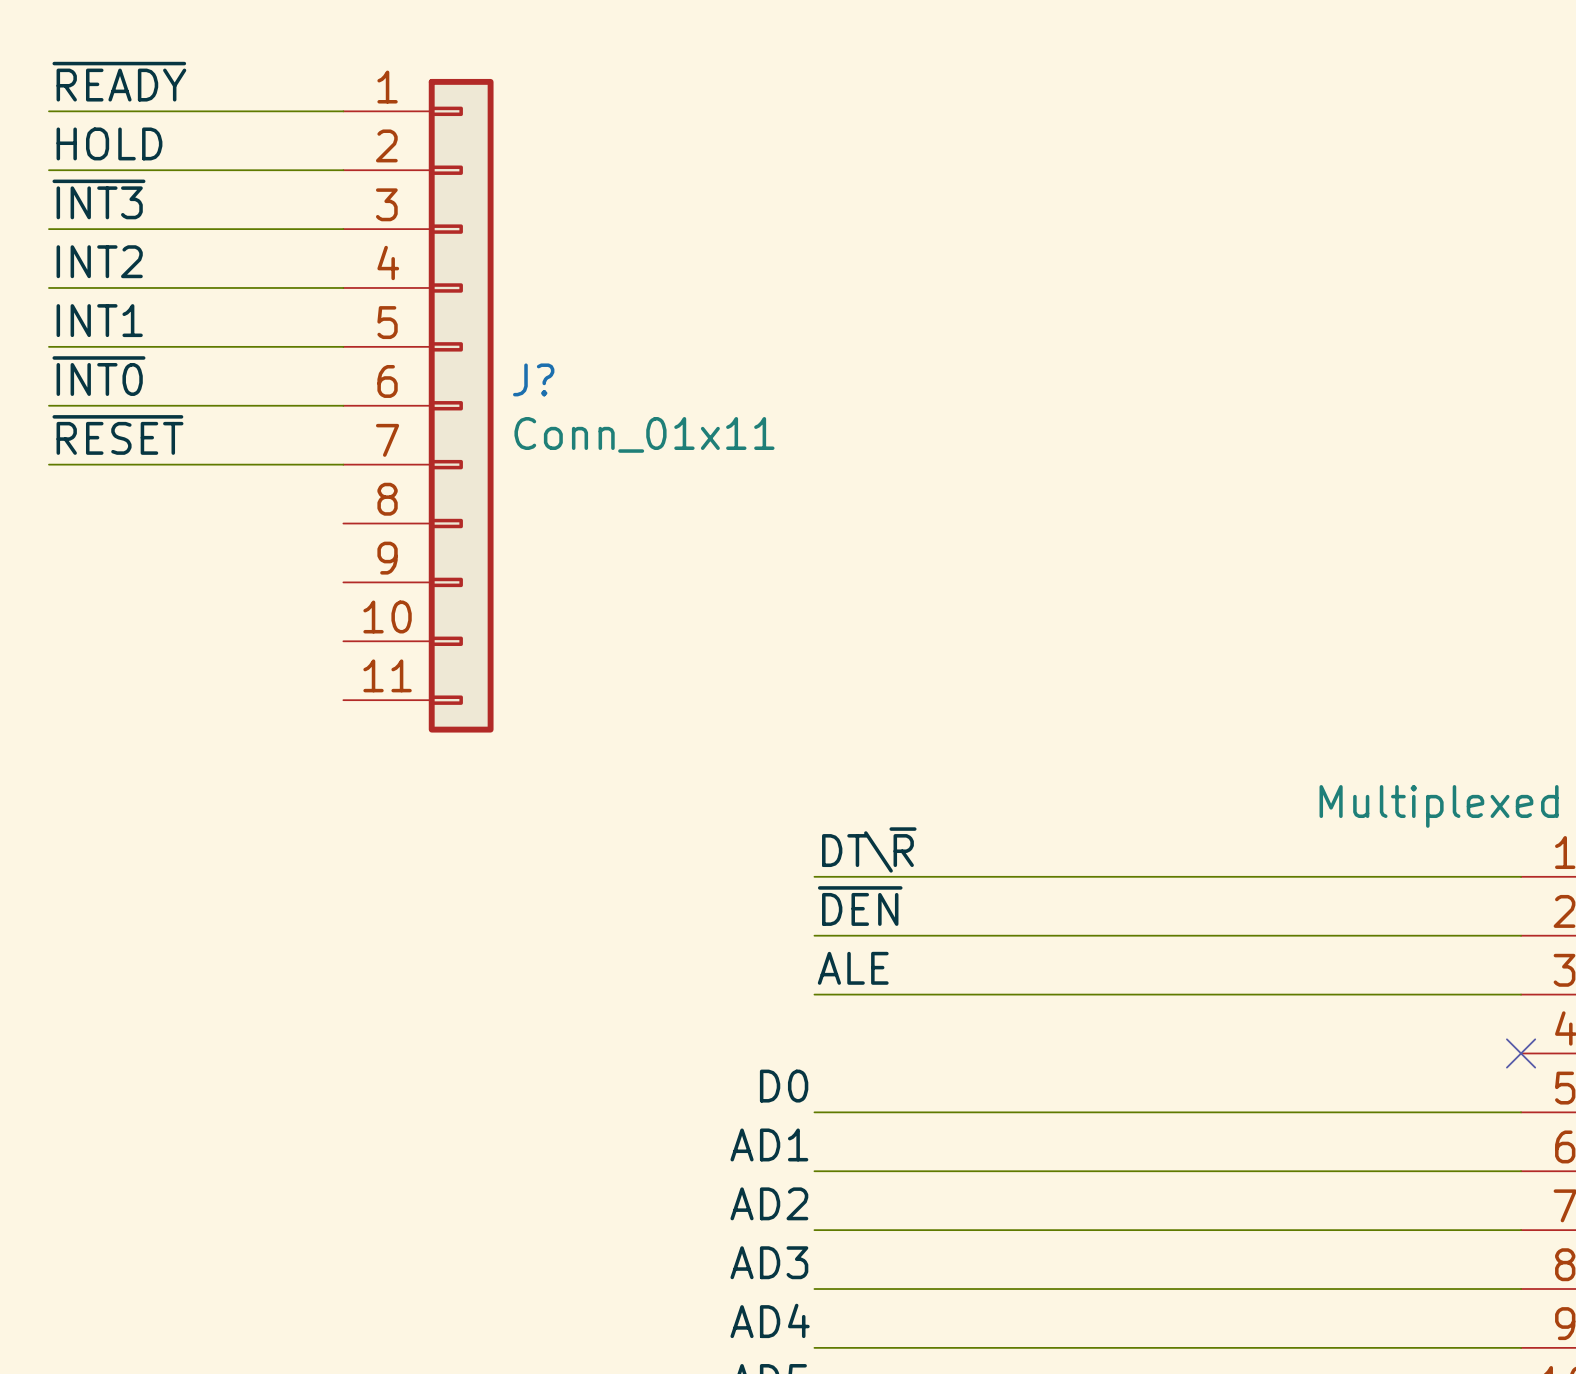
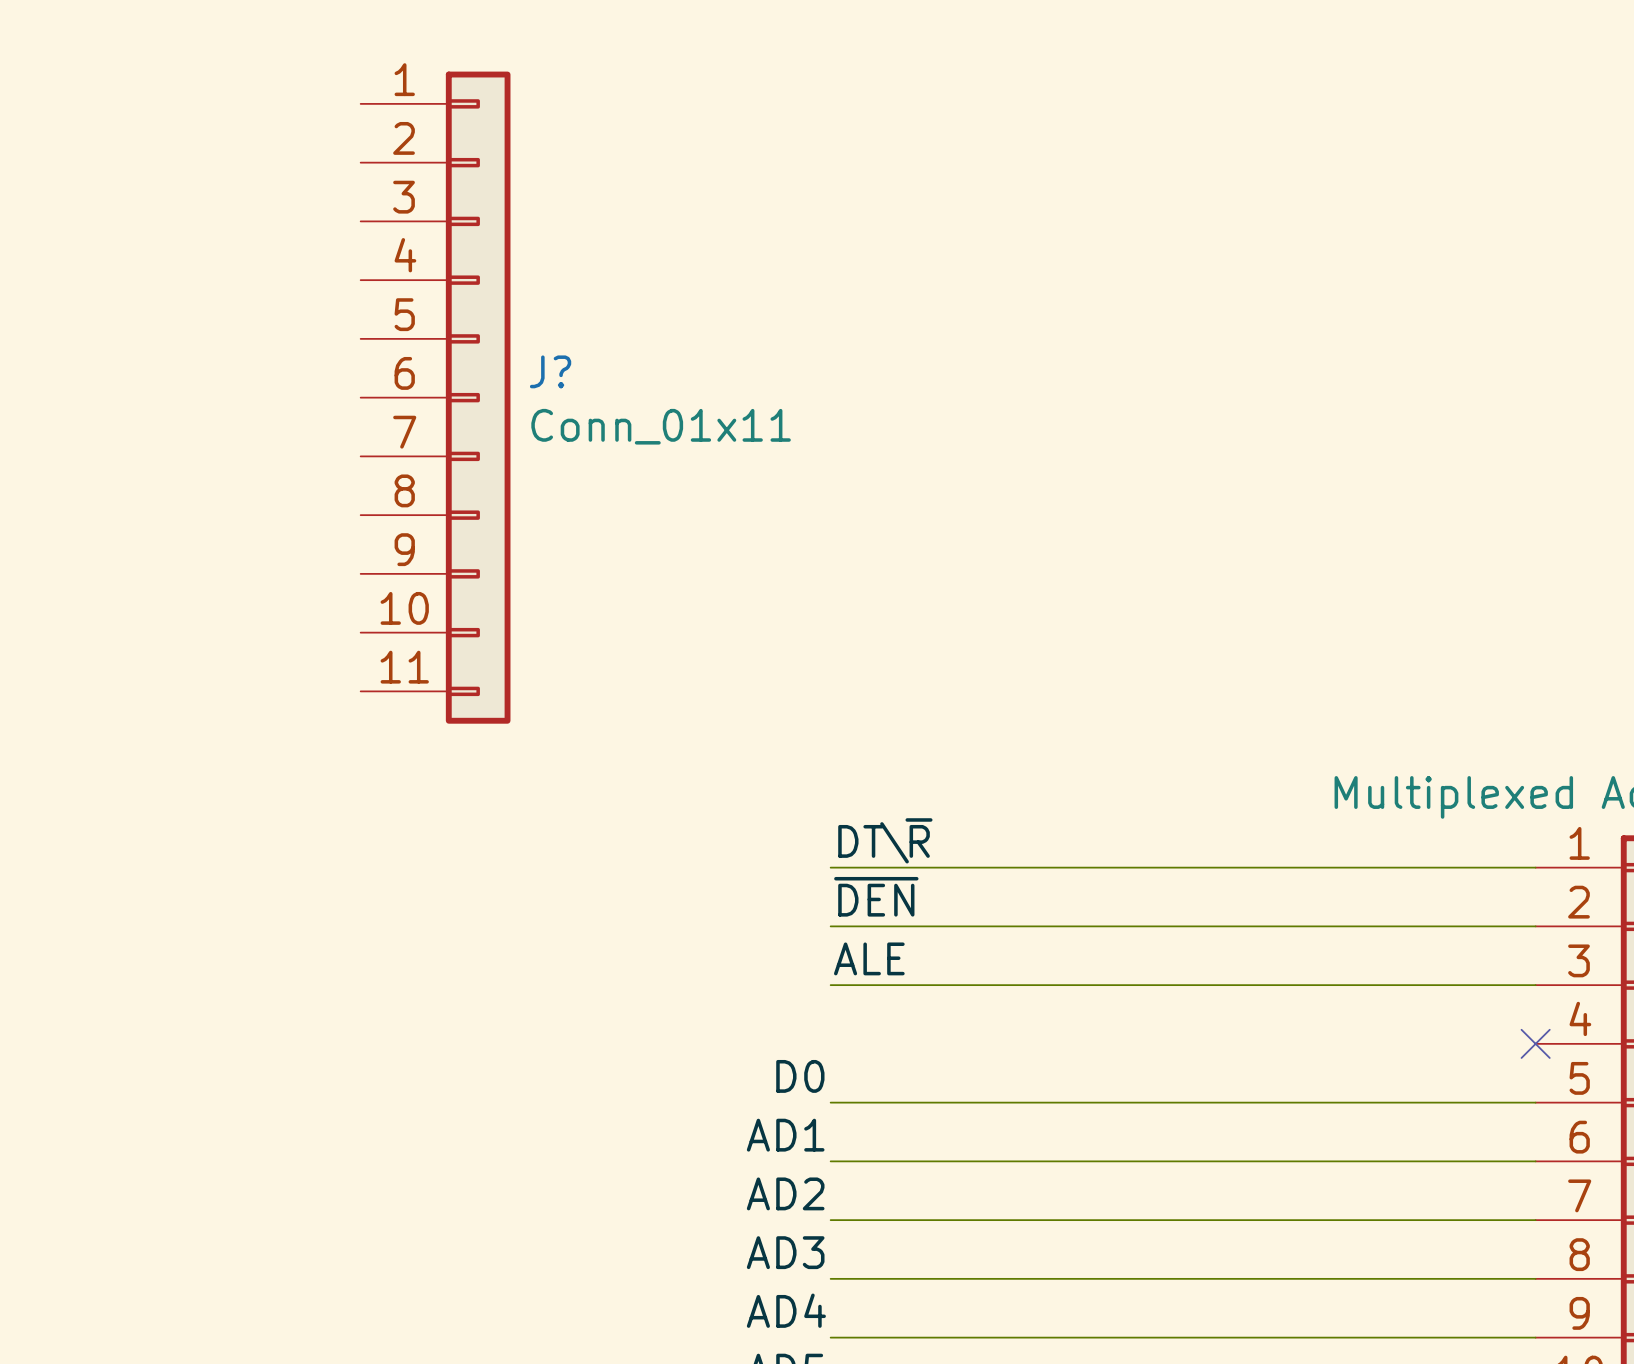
label: ~{READY} (119, 81) -> none
wire: (48, 111) (343, 111) -> none
label: HOLD (109, 143) -> none
wire: (48, 170) (343, 170) -> none
label: ~{INT3} (98, 199) -> none
wire: (48, 229) (343, 229) -> none
label: INT2 (99, 261) -> none
wire: (48, 287) (343, 287) -> none
label: INT1 (99, 320) -> none
wire: (48, 346) (343, 346) -> none
label: ~{INT0} (98, 376) -> none
wire: (48, 405) (343, 405) -> none
label: ~{RESET} (117, 434) -> none
wire: (48, 464) (343, 464) -> none

